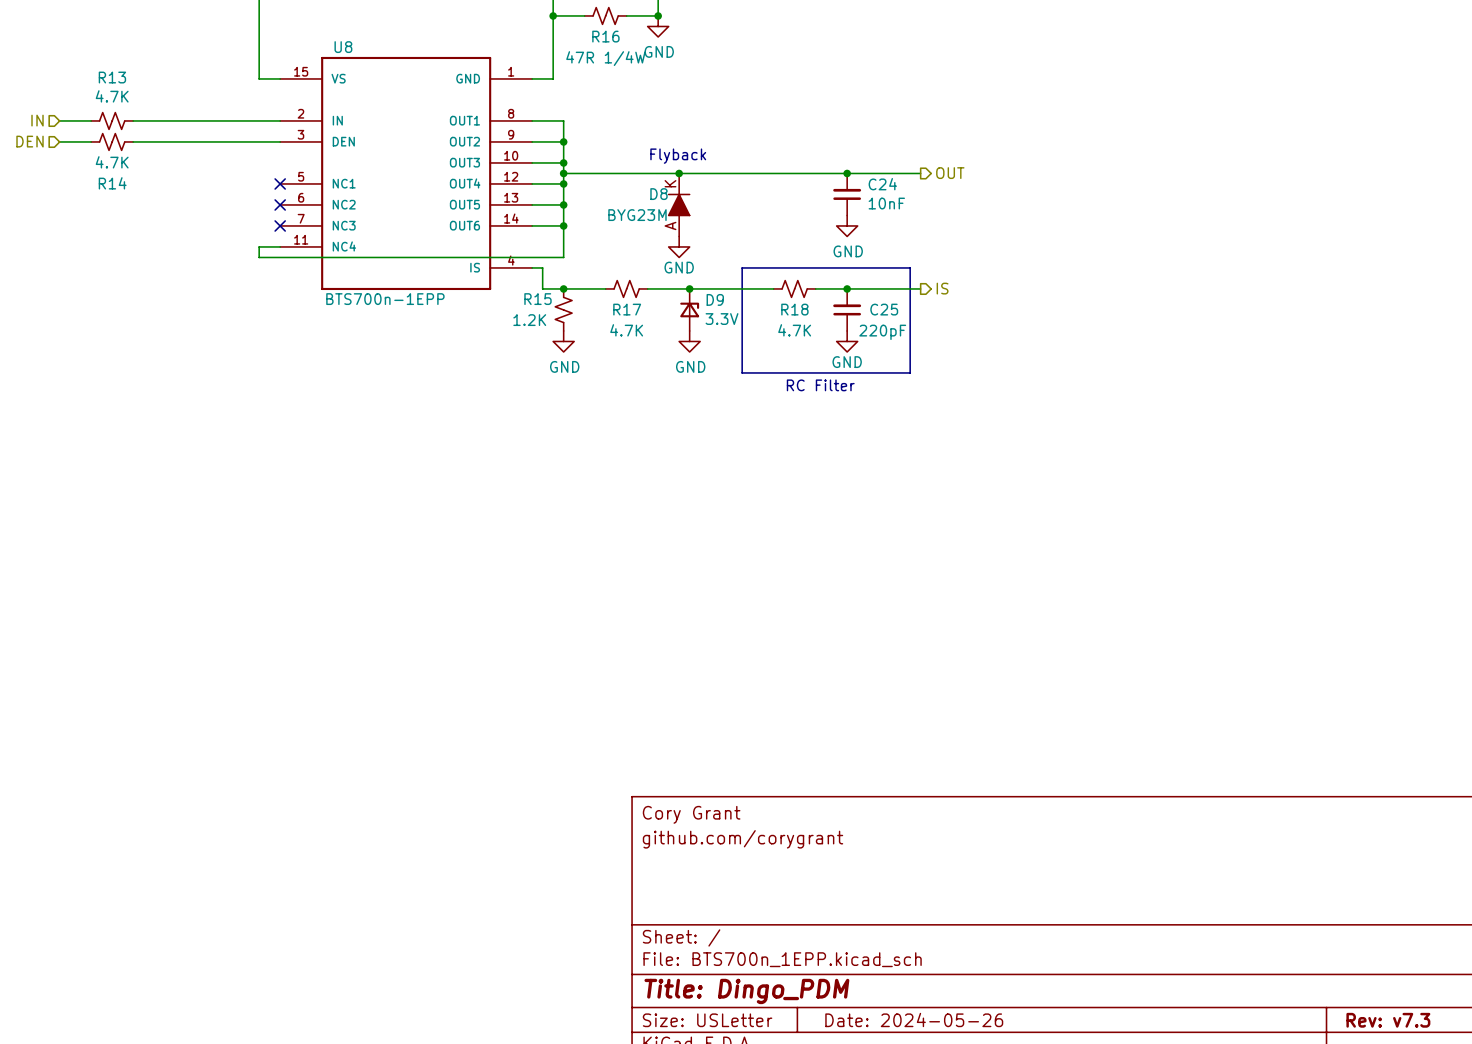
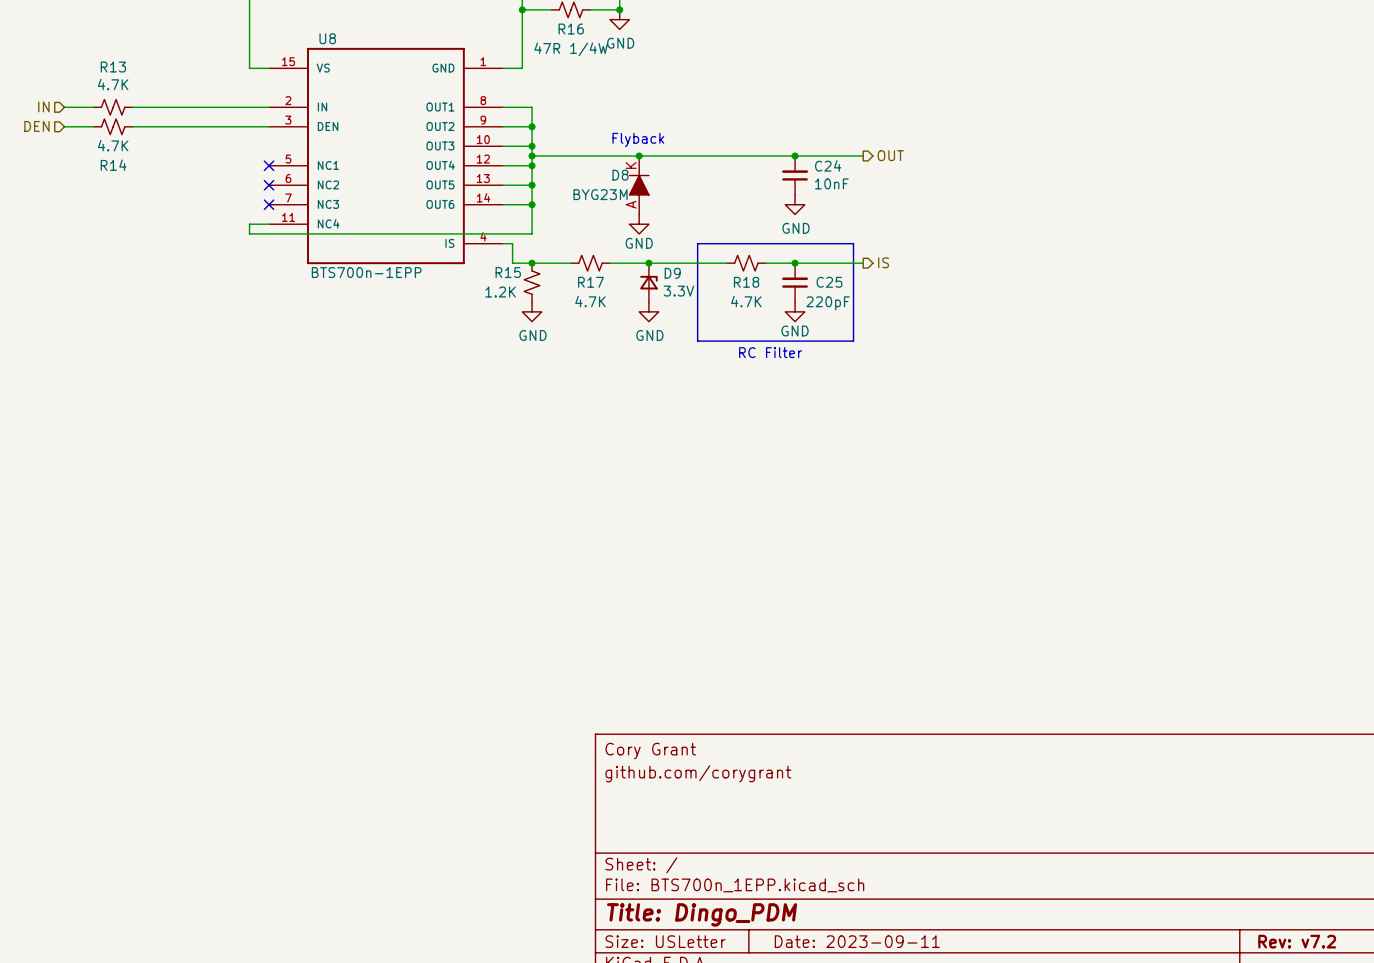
title block: Date: 2024-05-26 (914, 1019) -> Date: 2023-09-11 (857, 941)
title block: Rev: v7.3 (1388, 1020) -> Rev: v7.2 (1297, 941)

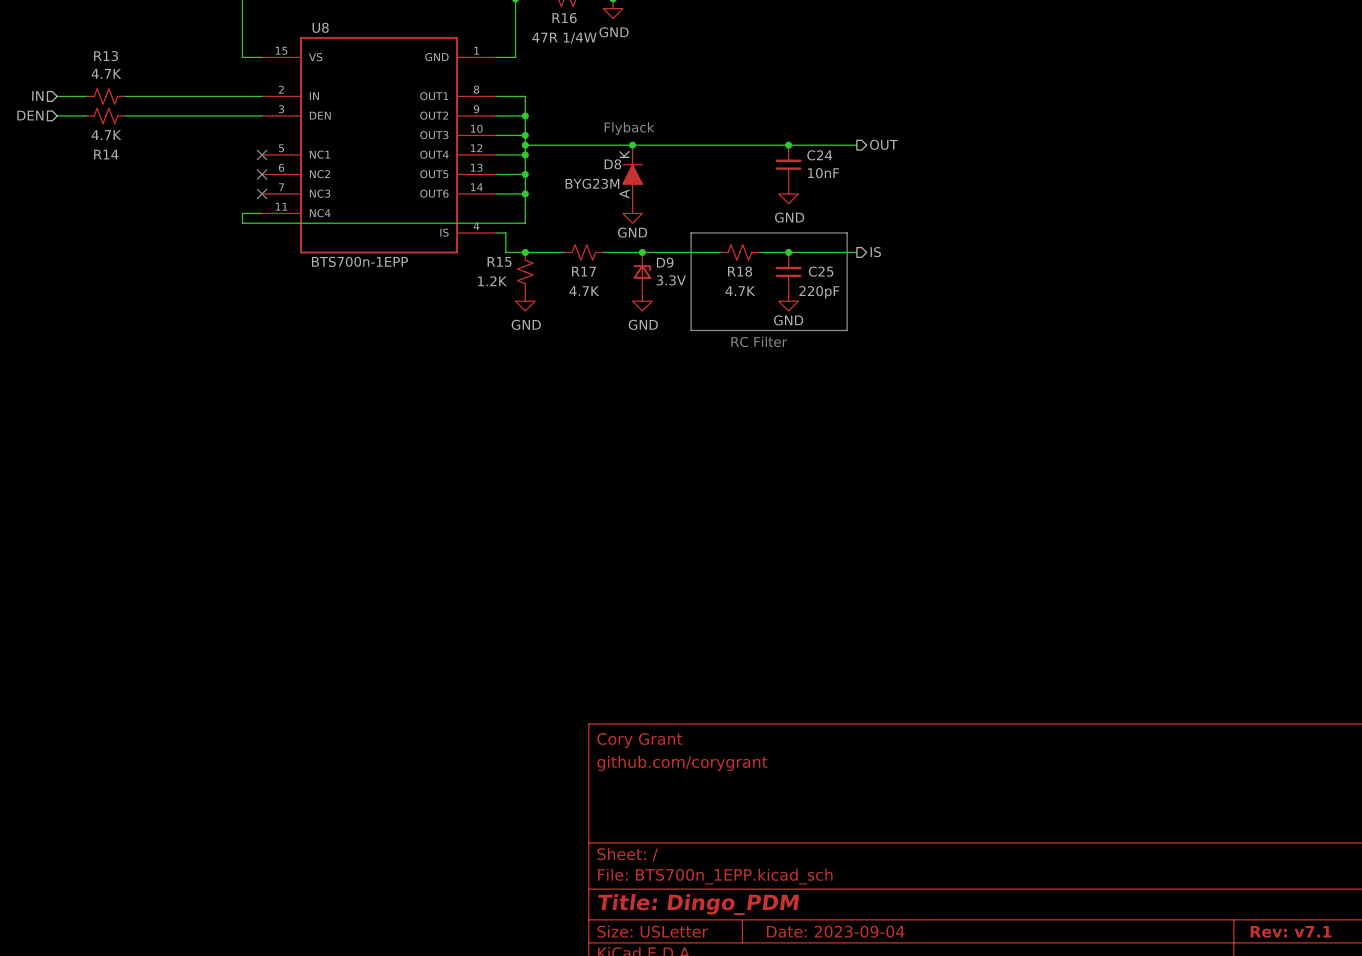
title block: Date: 2023-09-11 (857, 941) -> Date: 2023-09-04 (835, 931)
title block: Rev: v7.2 (1297, 941) -> Rev: v7.1 (1291, 931)

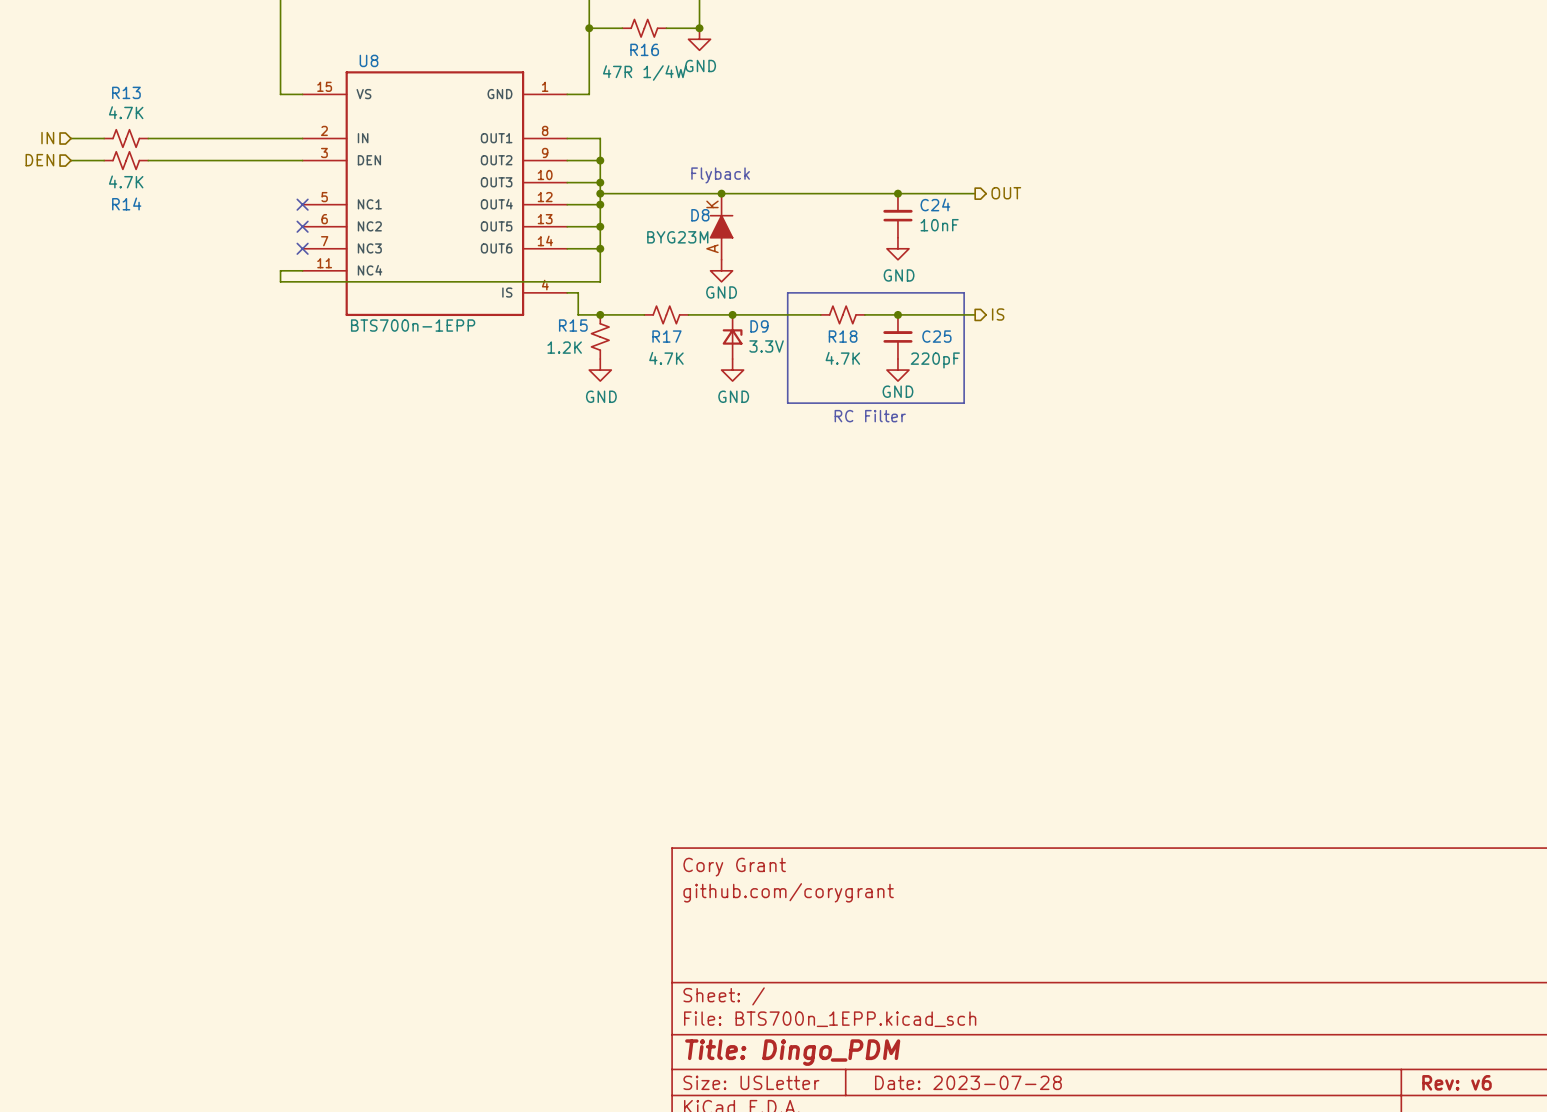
title block: Date: 2023-09-04 (835, 931) -> Date: 2023-07-28 (968, 1082)
title block: Rev: v7.1 (1291, 931) -> Rev: v6 (1456, 1082)

